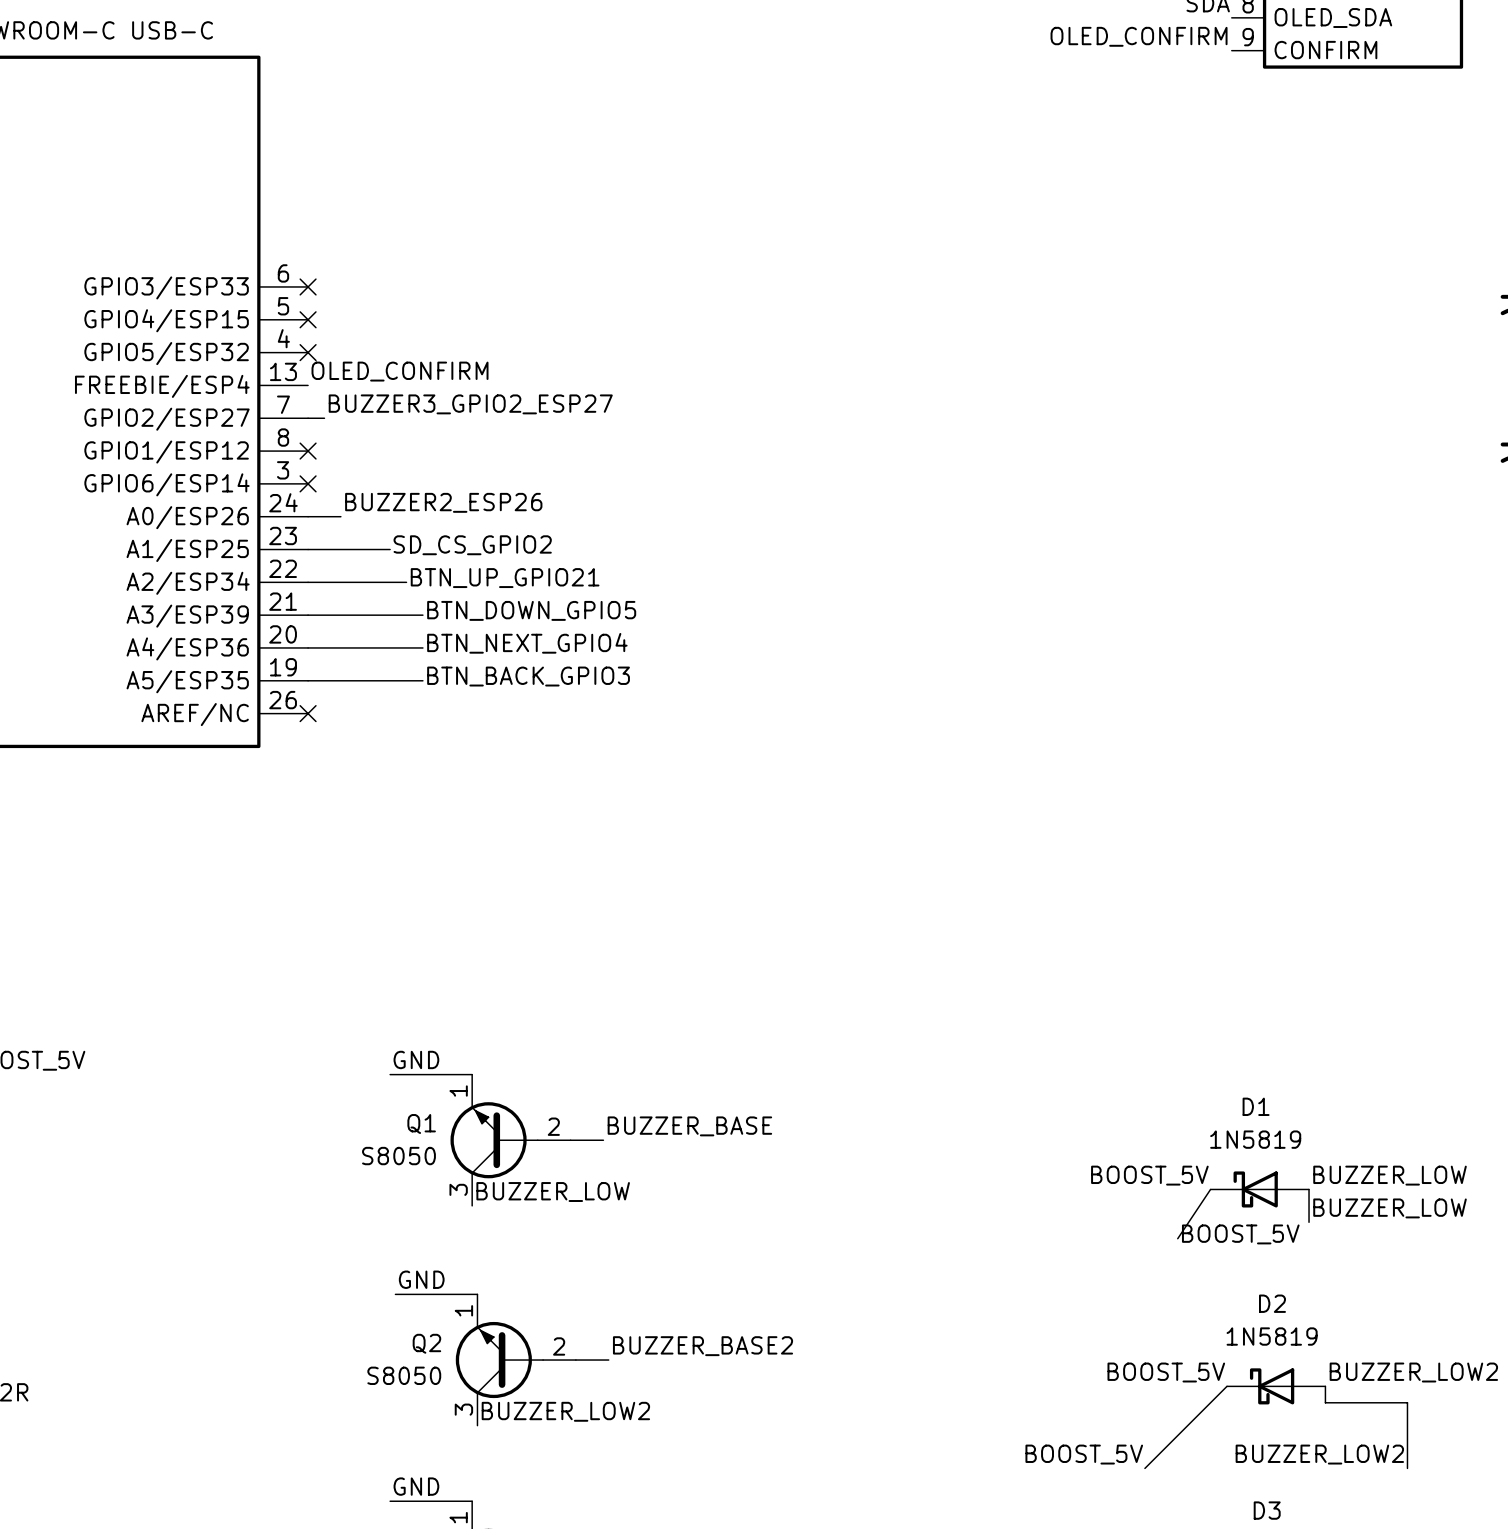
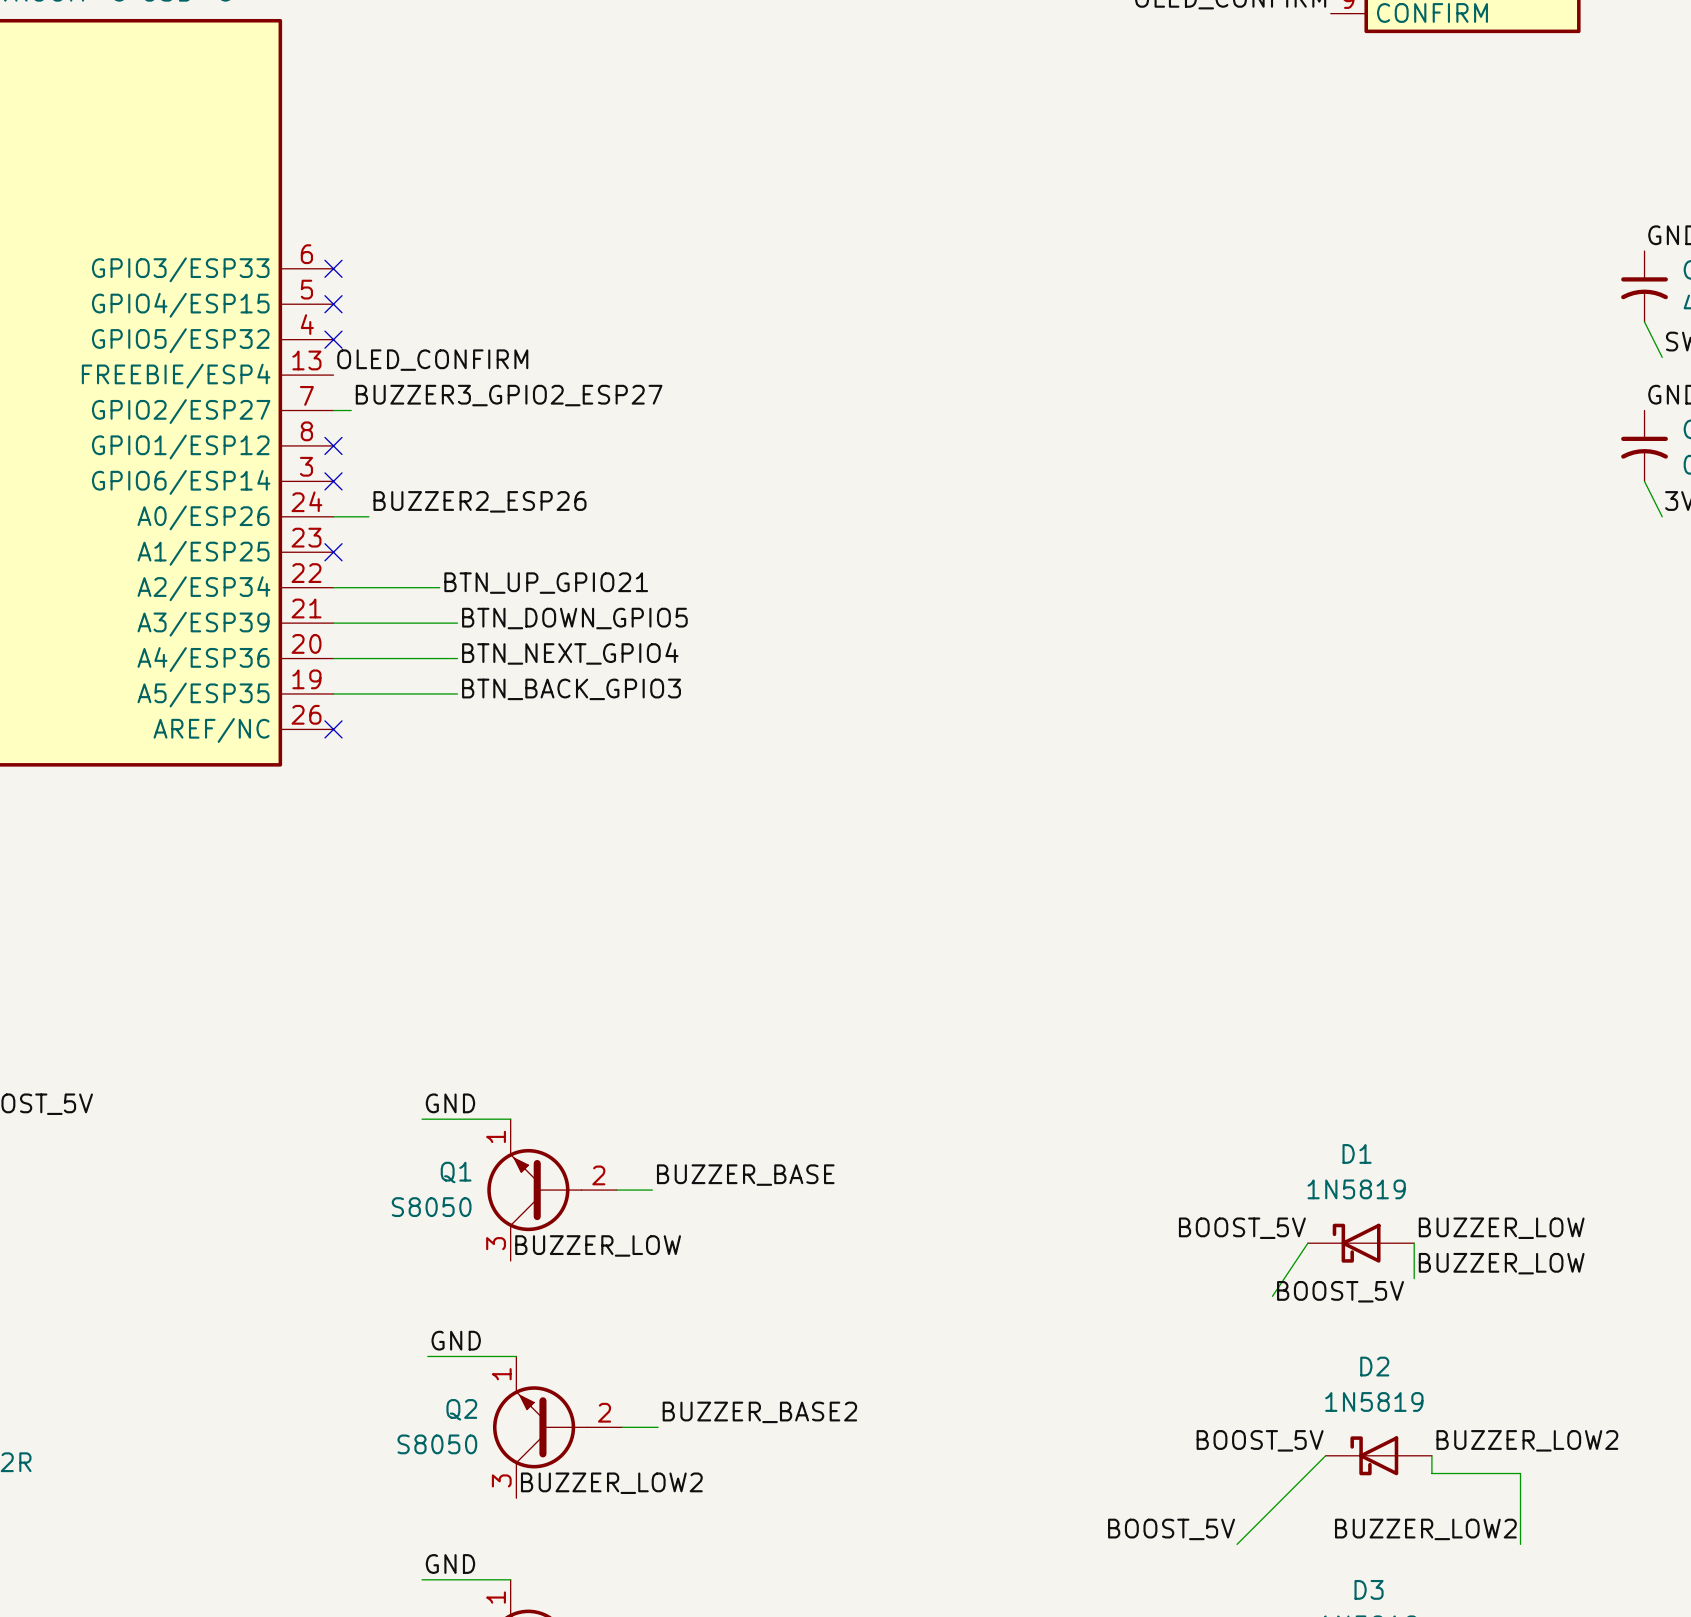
label: SD_CS_GPIO2 (472, 545) -> none
wire: (308, 549) (390, 549) -> none
no-connect mark: none -> (333, 552)

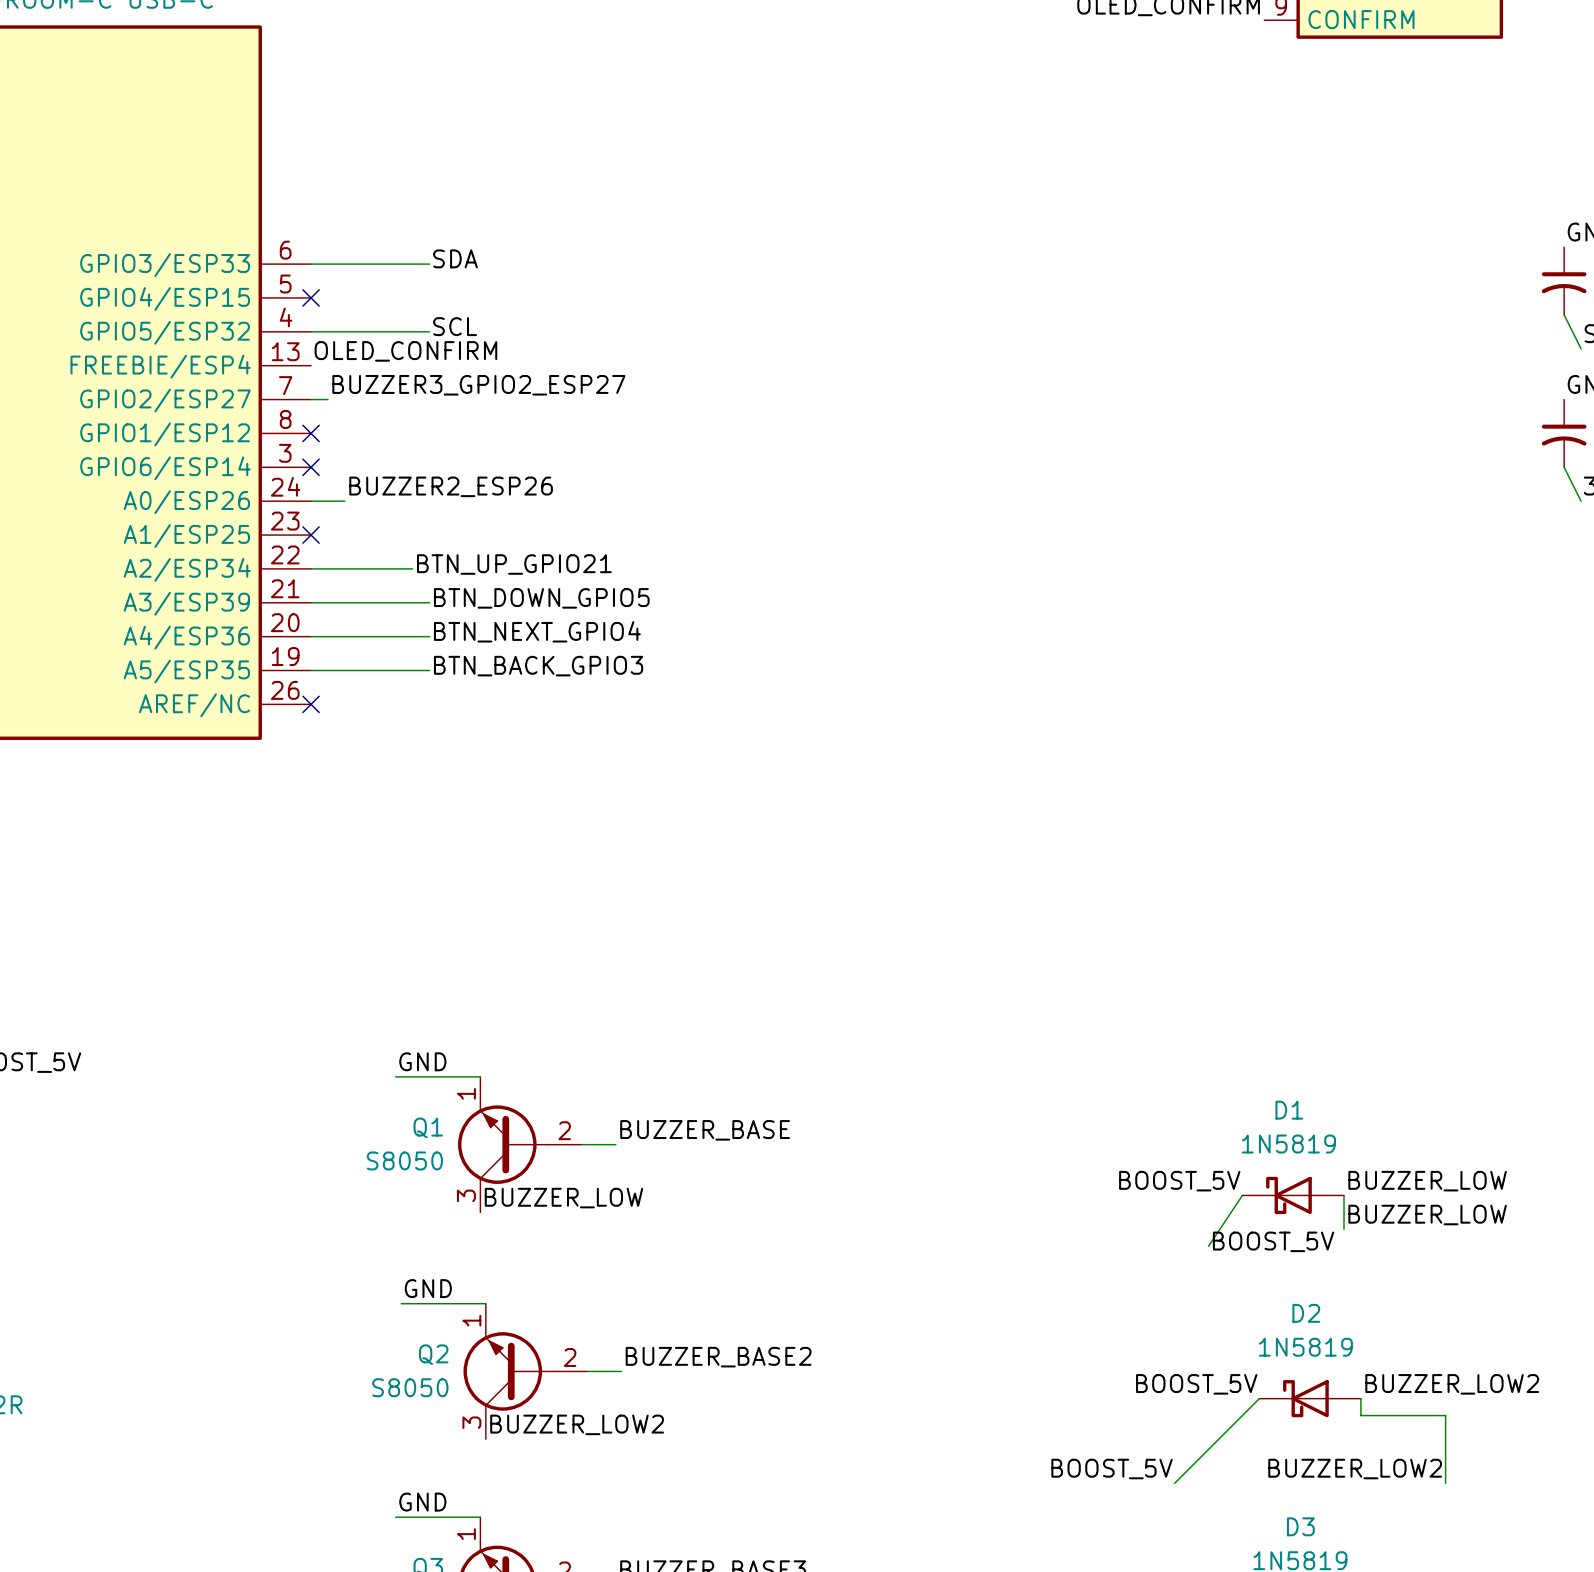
label: none -> SDA (455, 258)
wire: none -> (311, 264) (429, 264)
no-connect mark: (333, 268) -> none
label: none -> SCL (455, 326)
wire: none -> (311, 331) (429, 331)
no-connect mark: (333, 339) -> none

